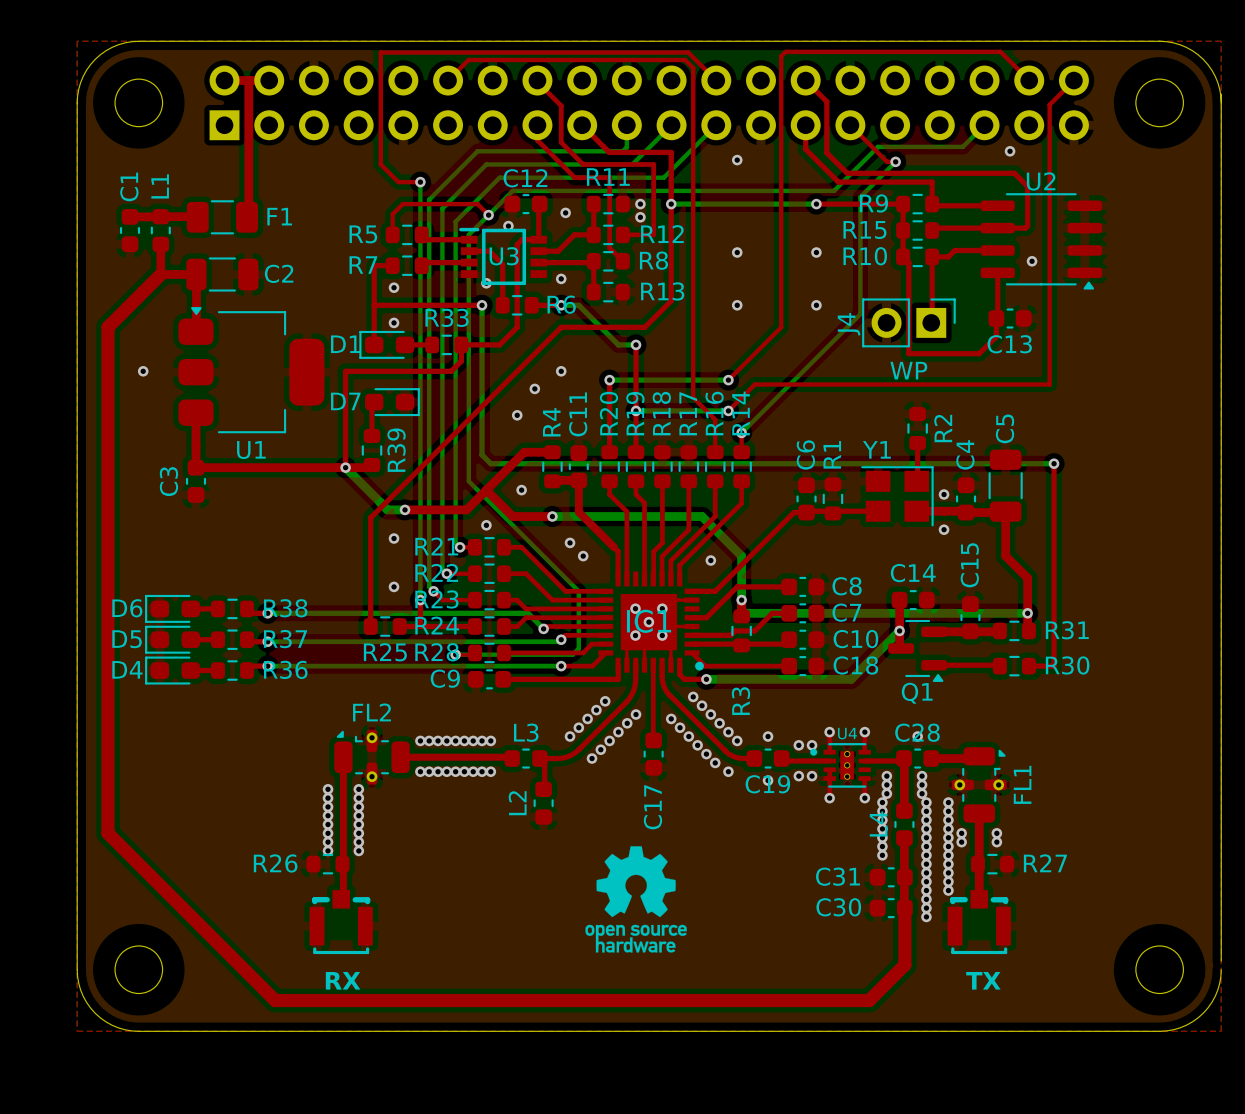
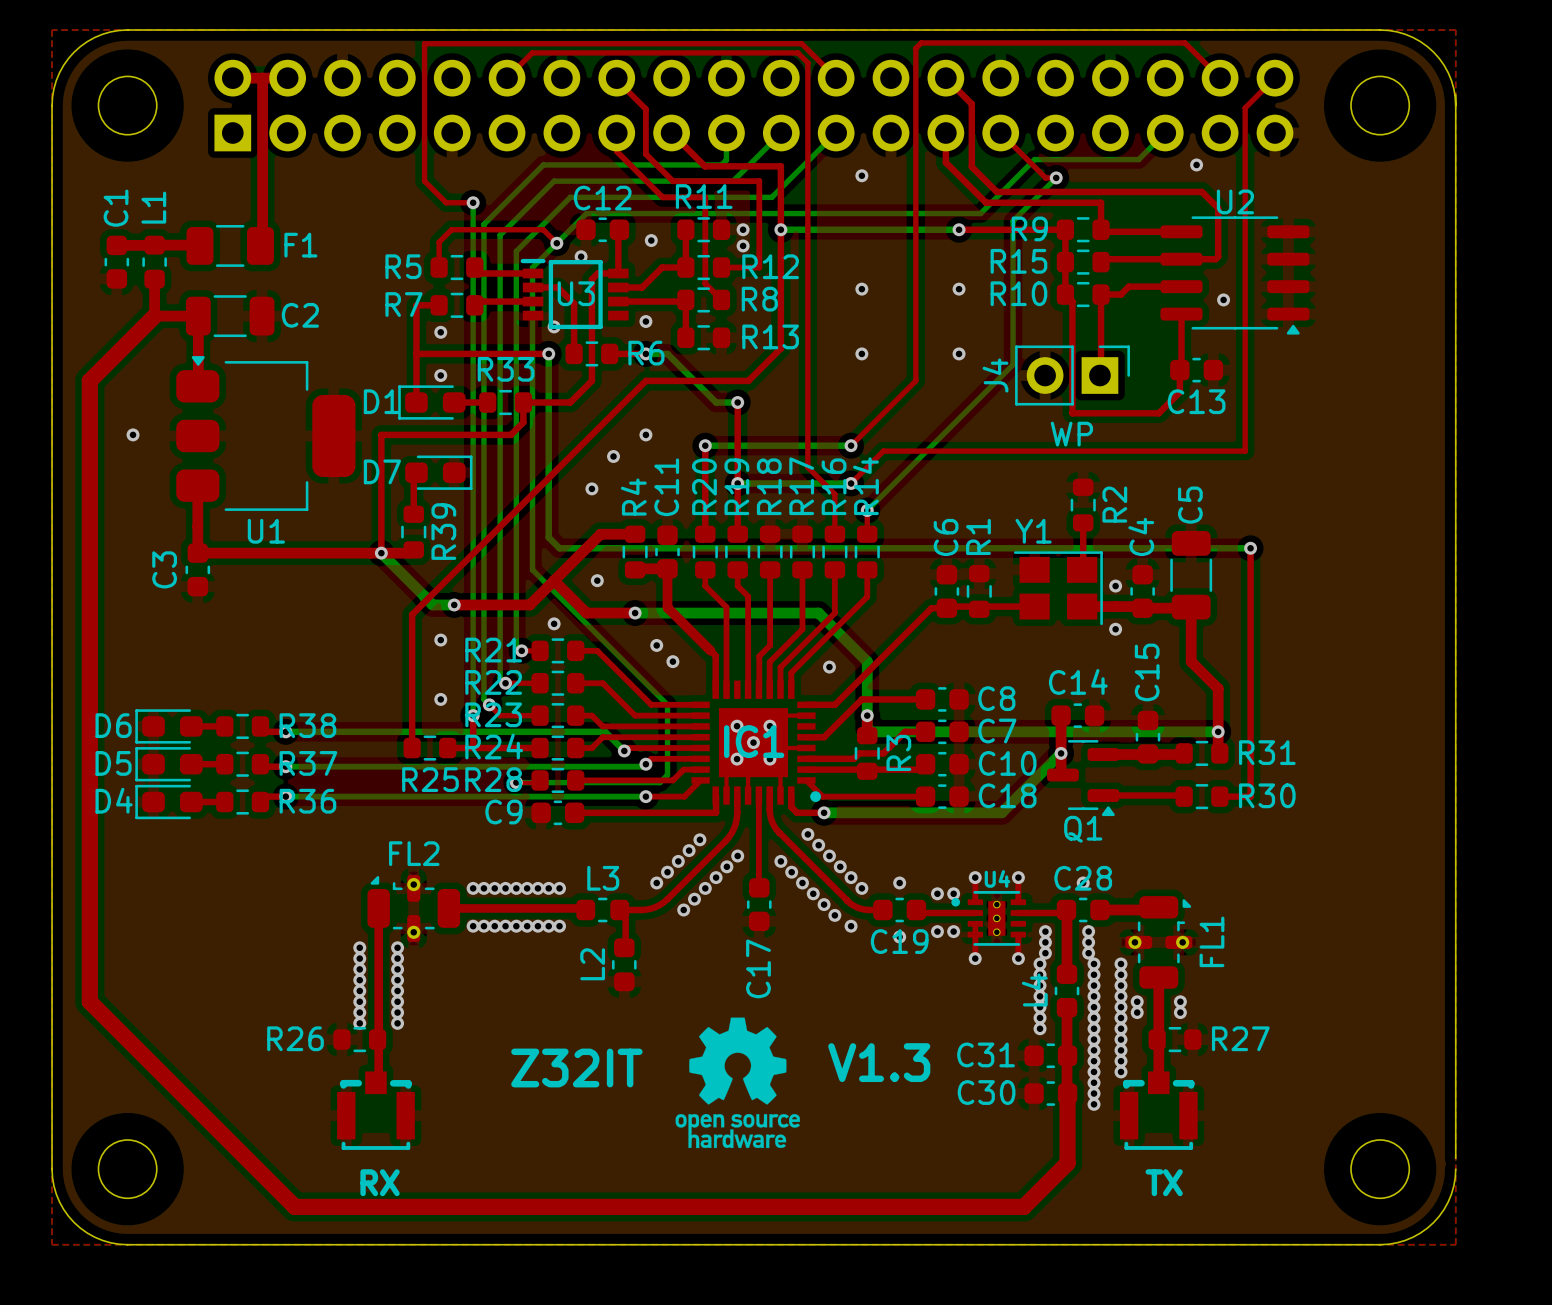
R3 name position: R3 (740, 701) -> R3 (898, 752)
text: none -> V1.3 (879, 1062)
text: none -> Z32IT (576, 1068)

